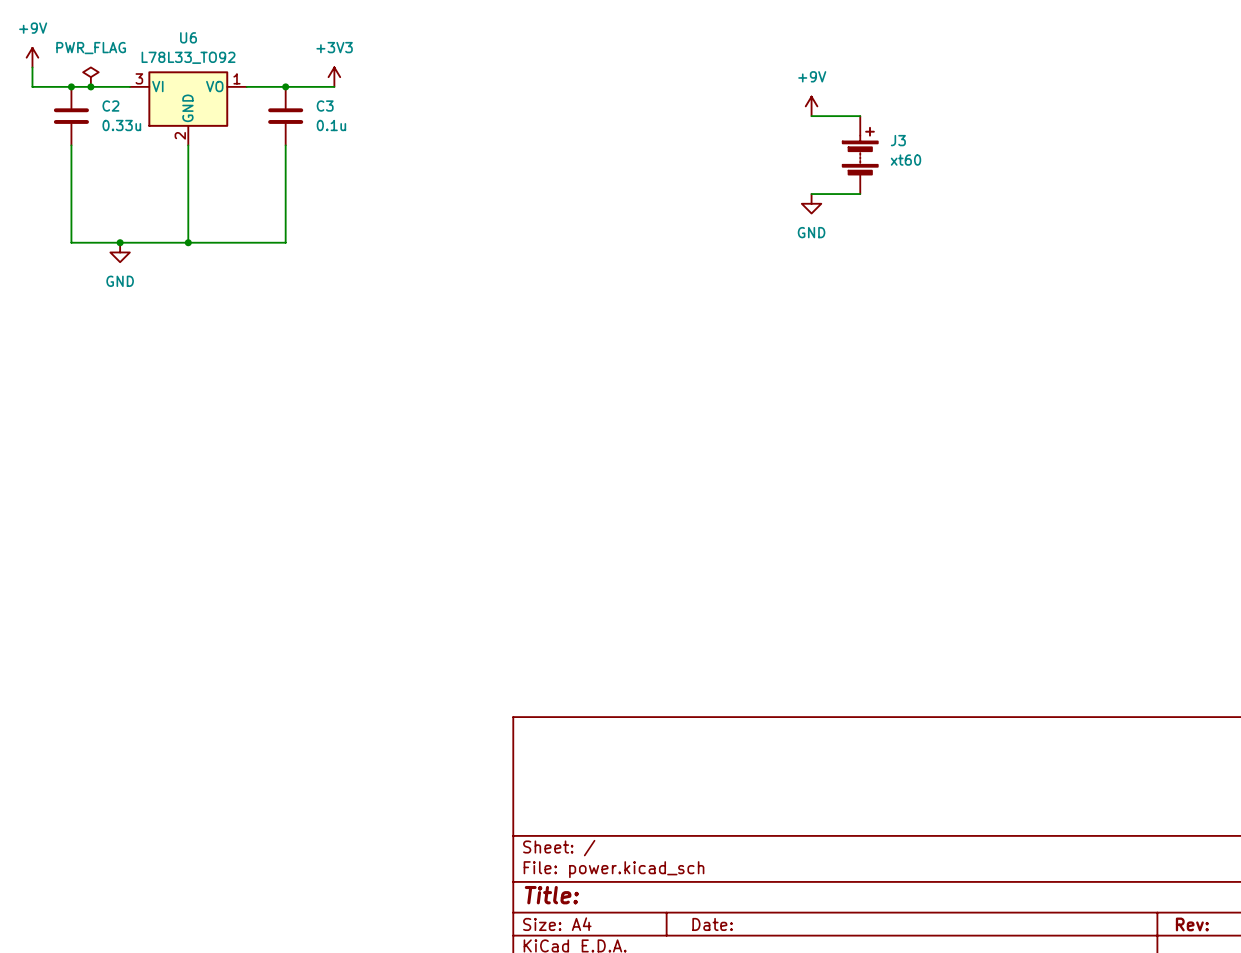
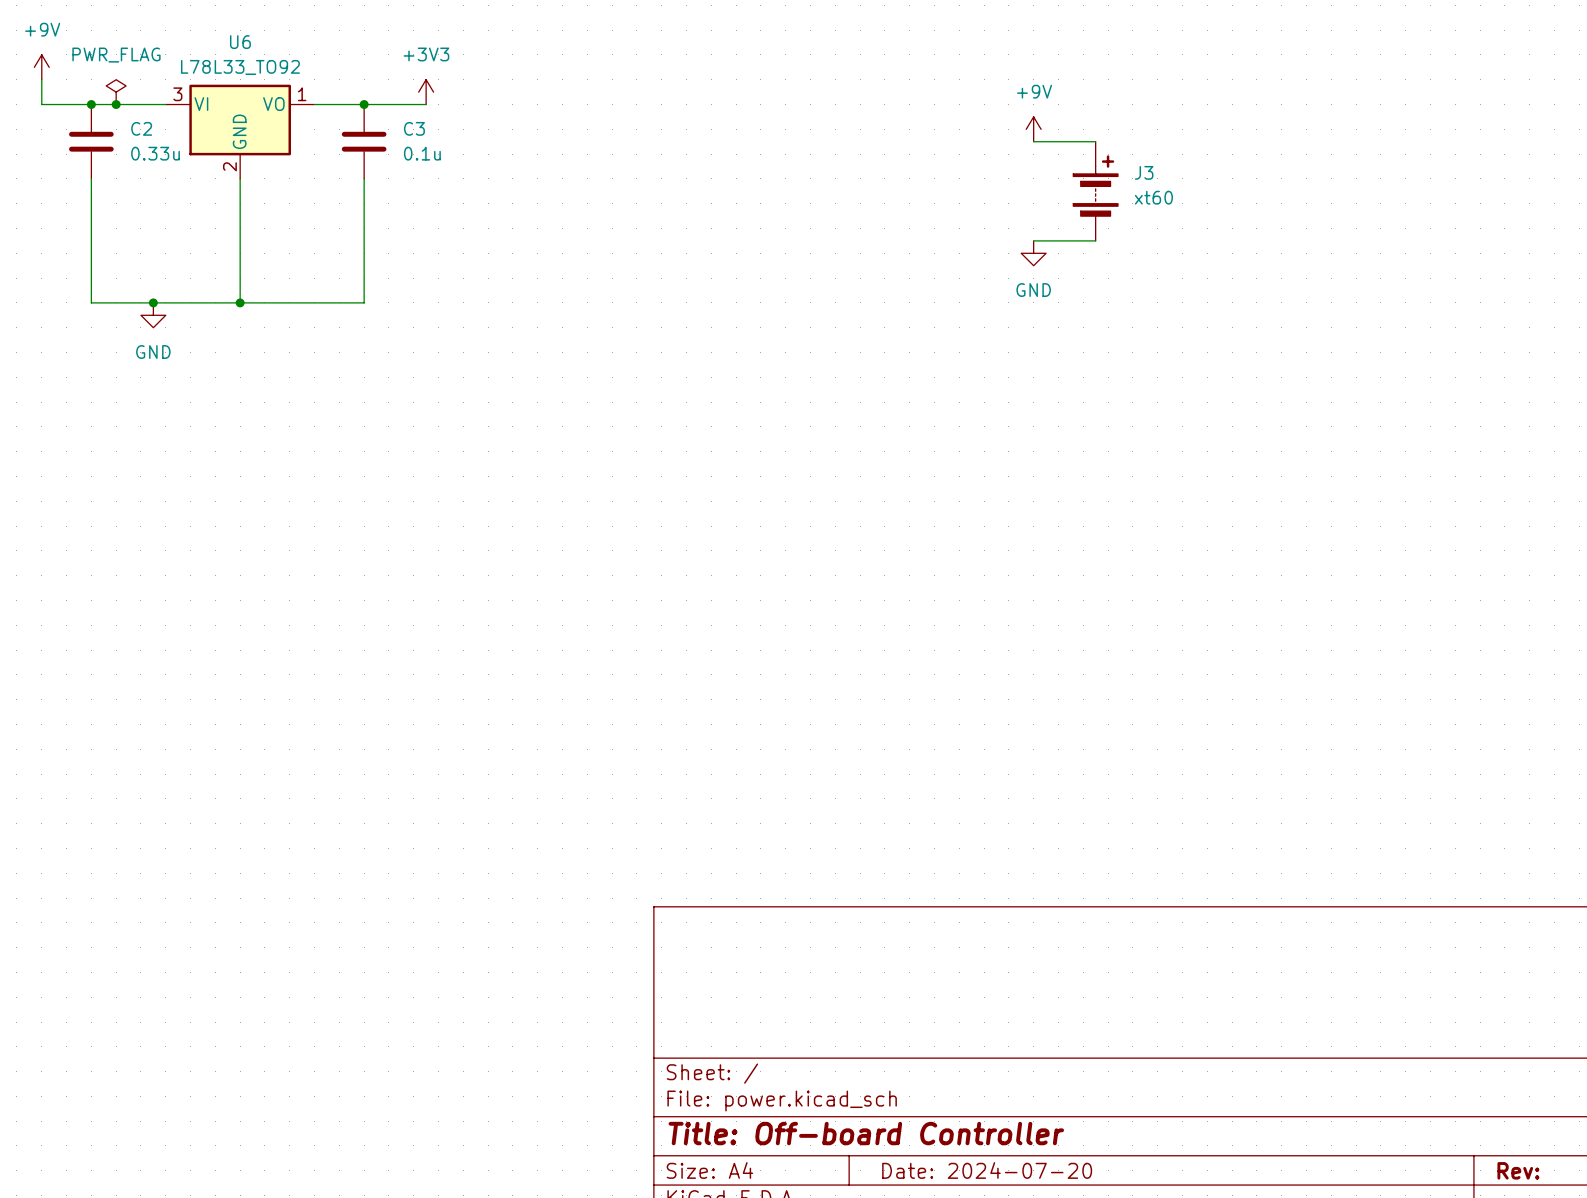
title block: Title: (551, 895) -> Title: Off-board Controller (866, 1133)
title block: Date: (712, 924) -> Date: 2024-07-20 (987, 1170)

